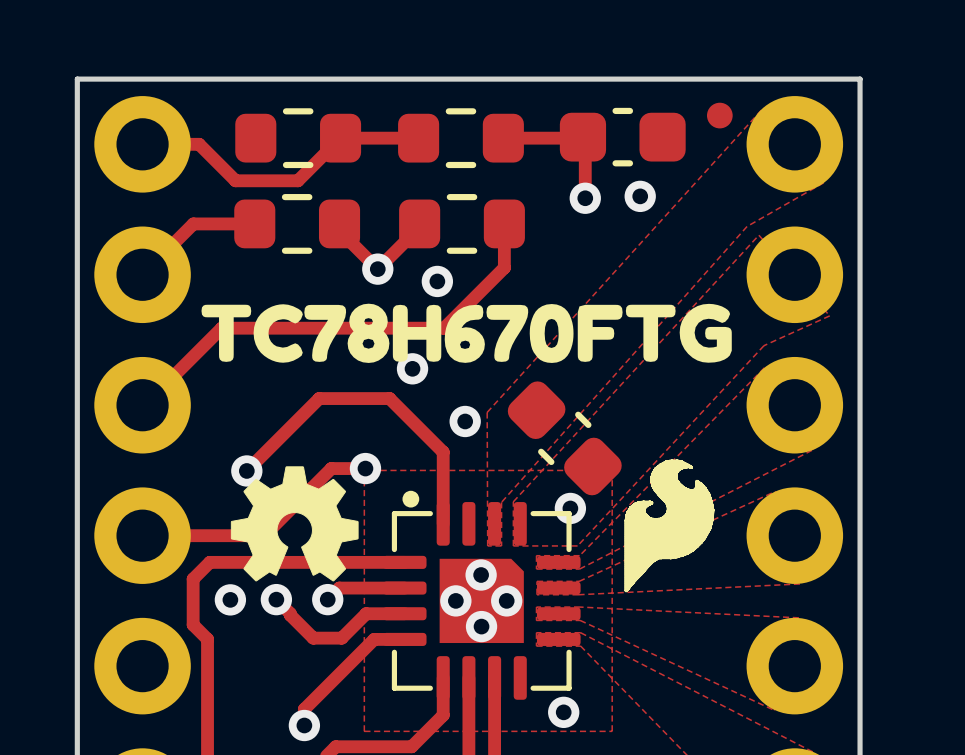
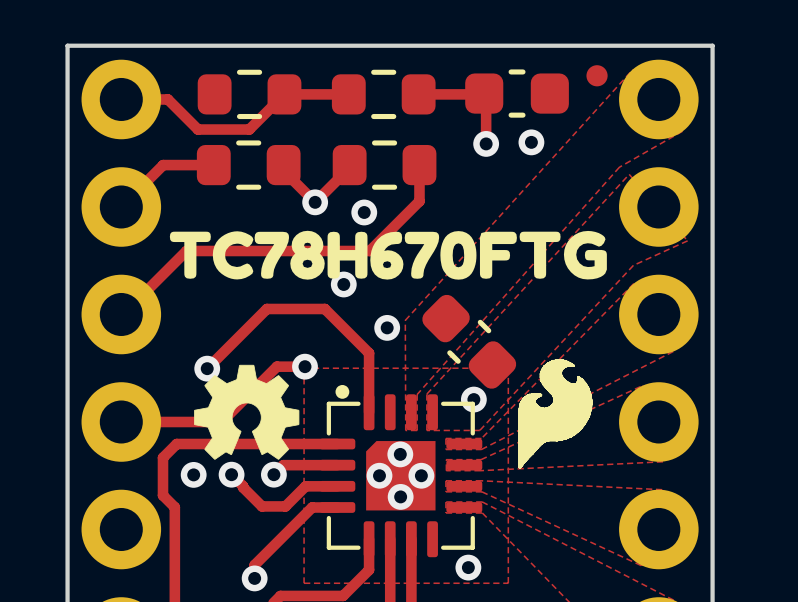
part footprint: [382, 490, 581, 700] -> [319, 384, 483, 558]

